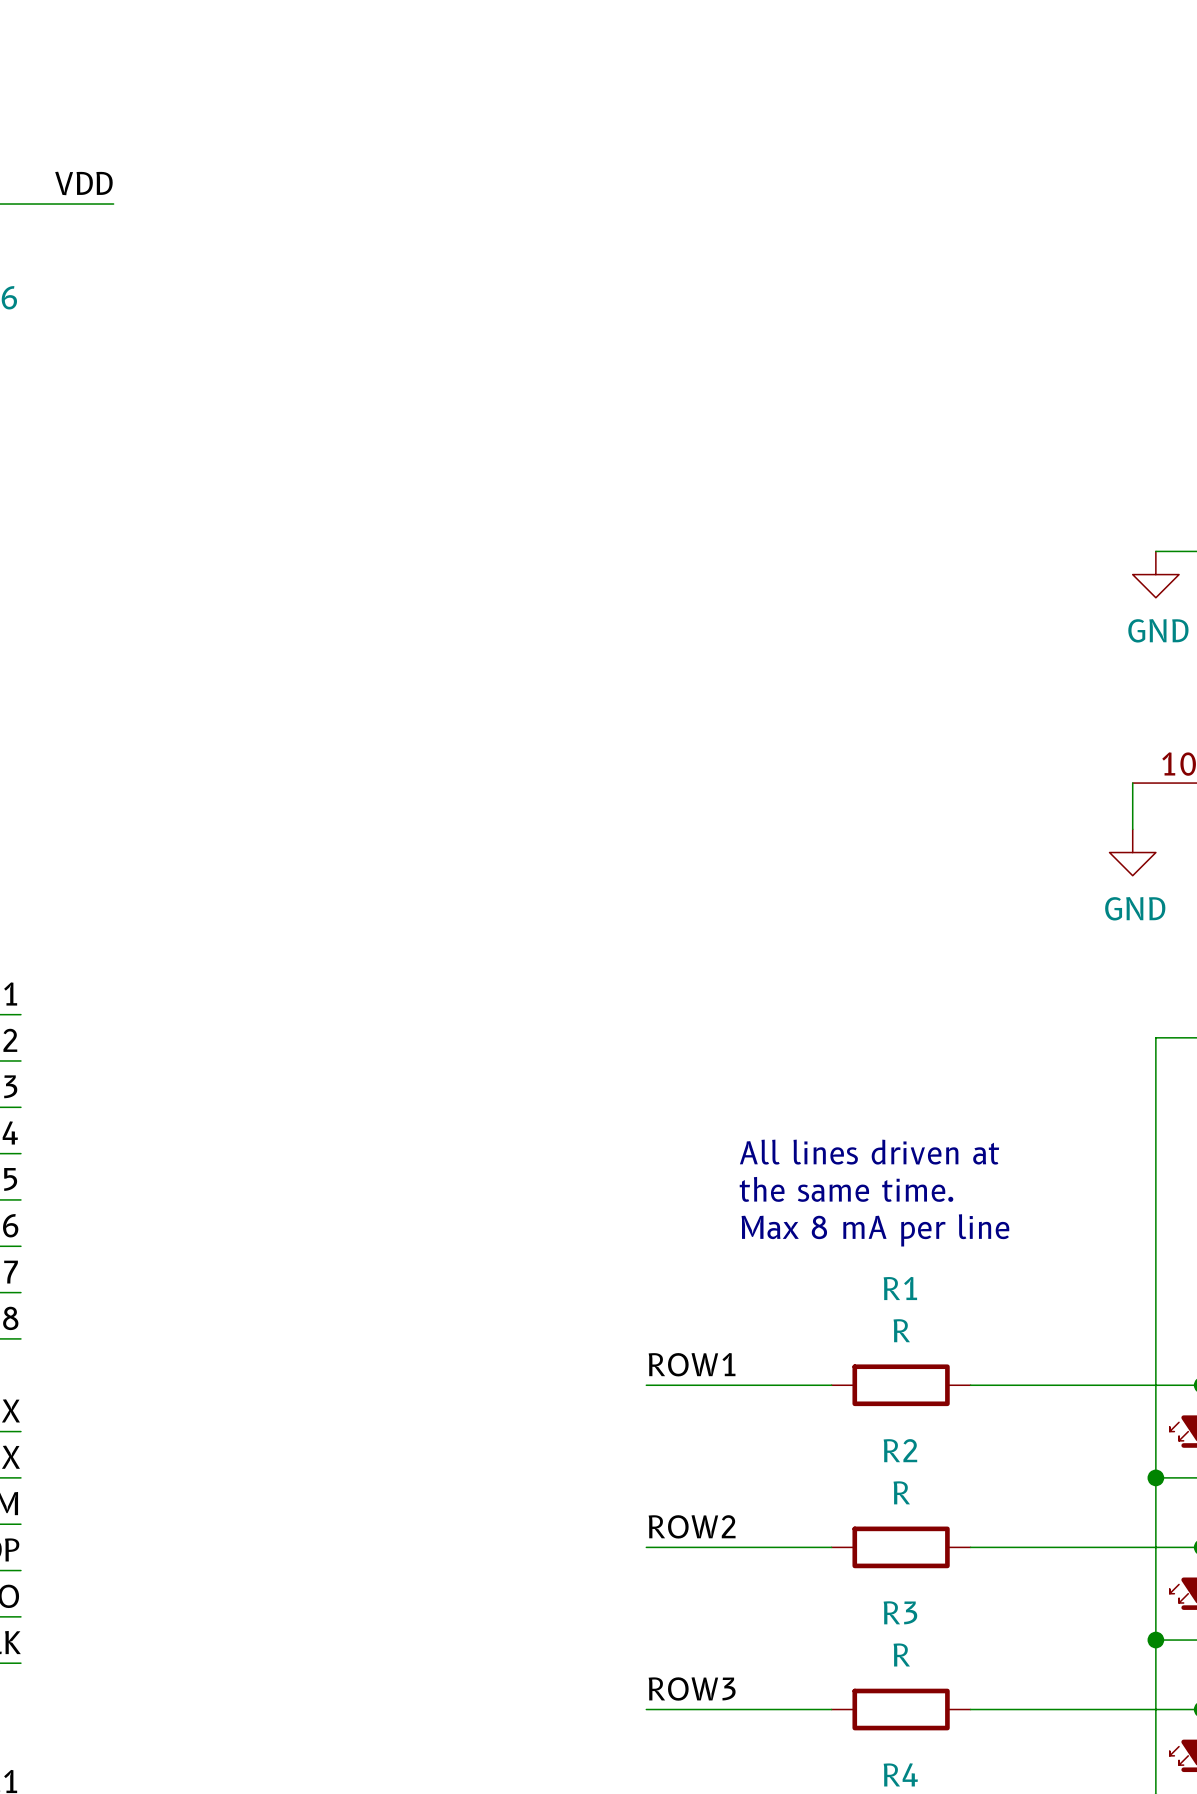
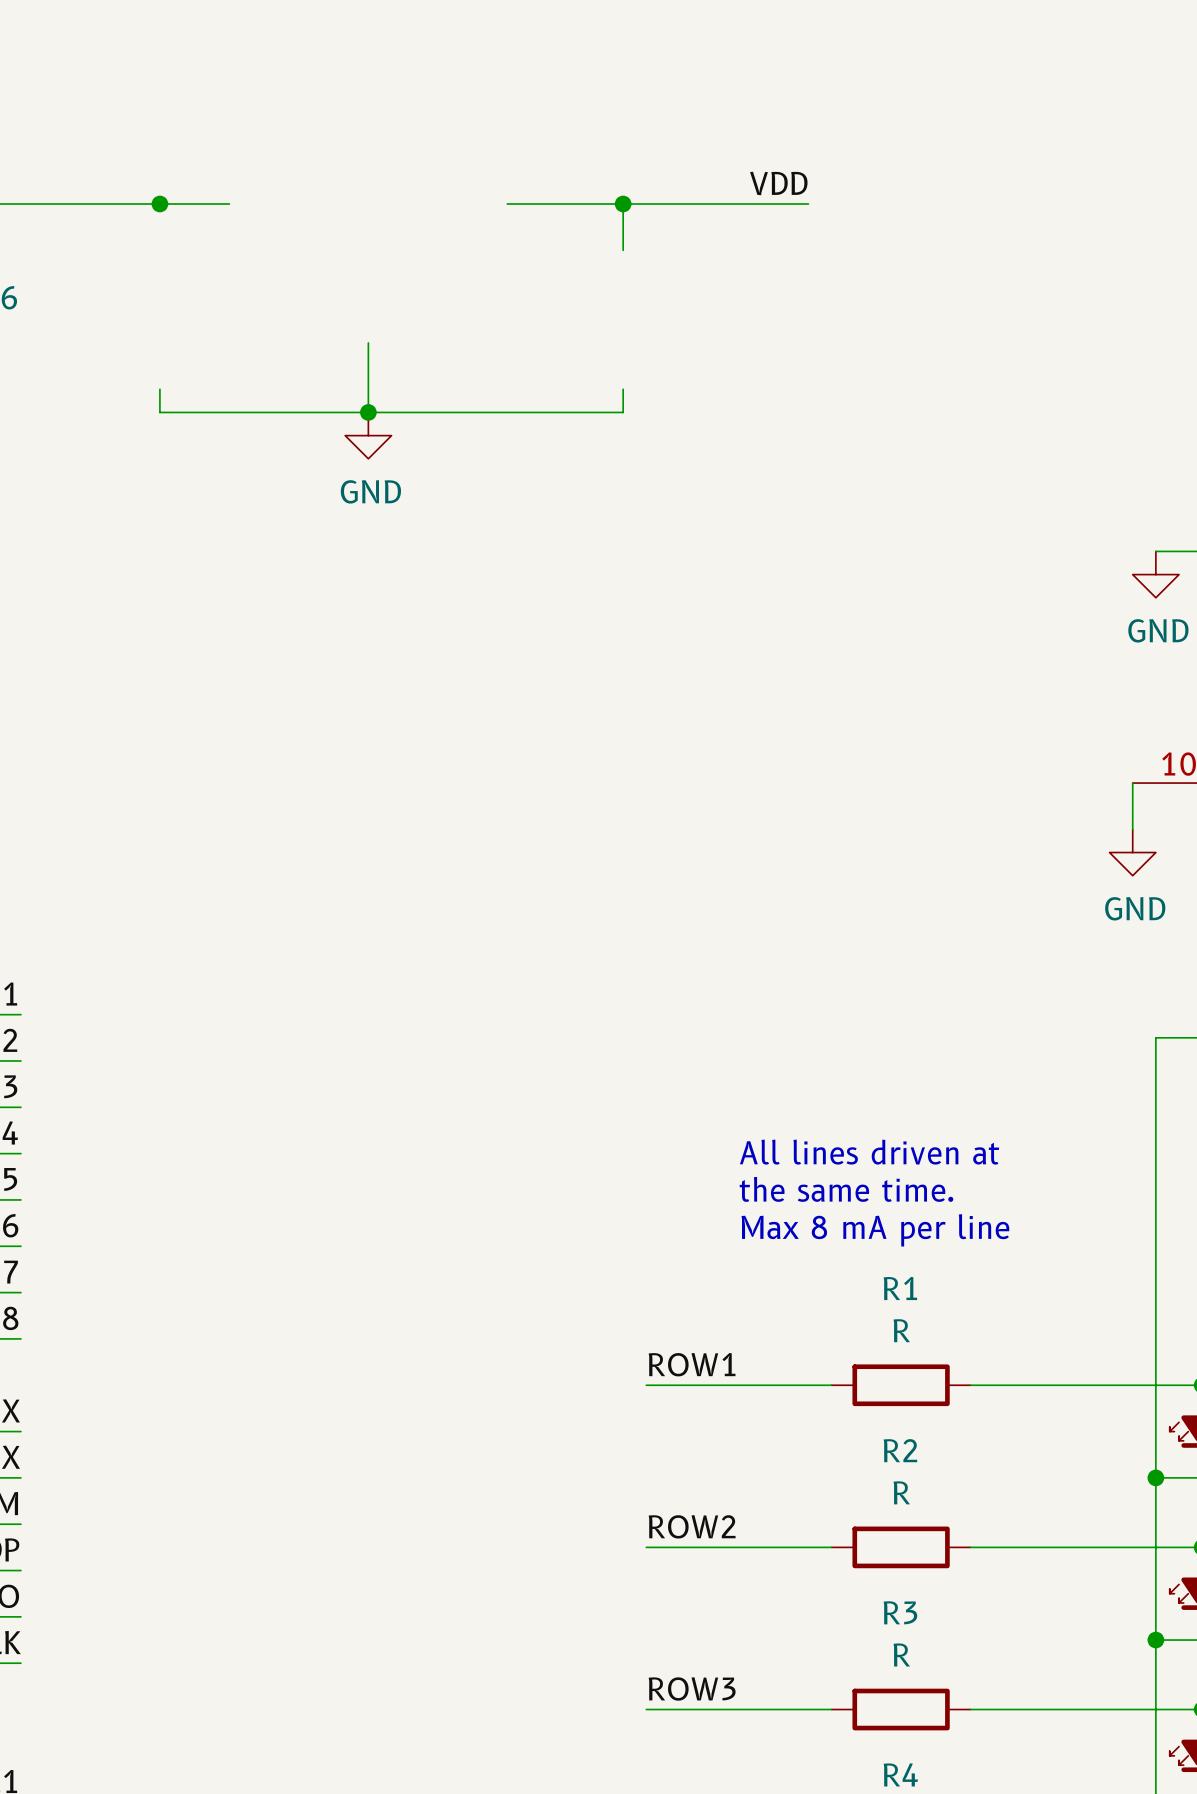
label: VDD (83, 183) -> none
label: none -> VDD (778, 183)
wire: none -> (113, 204) (229, 204)
junction: none -> (159, 204)
wire: none -> (507, 204) (808, 204)
wire: none -> (623, 204) (623, 250)
junction: none -> (623, 204)
wire: none -> (368, 342) (368, 412)
wire: none -> (159, 389) (159, 412) (623, 412) (623, 389)
junction: none -> (368, 412)
power symbol: none -> GND (368, 435)

